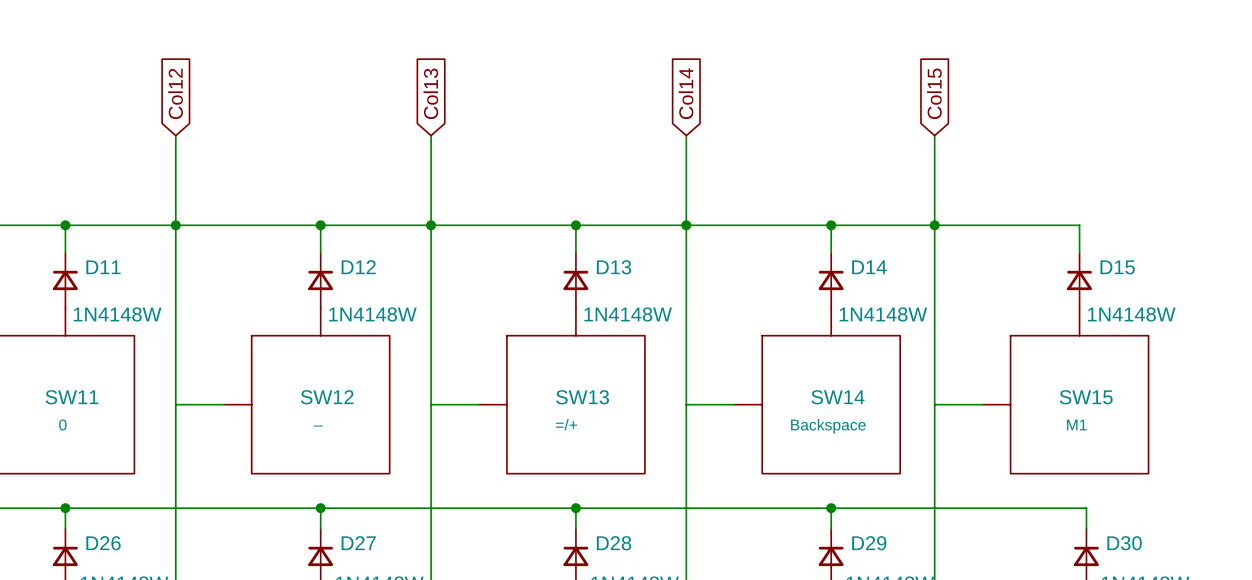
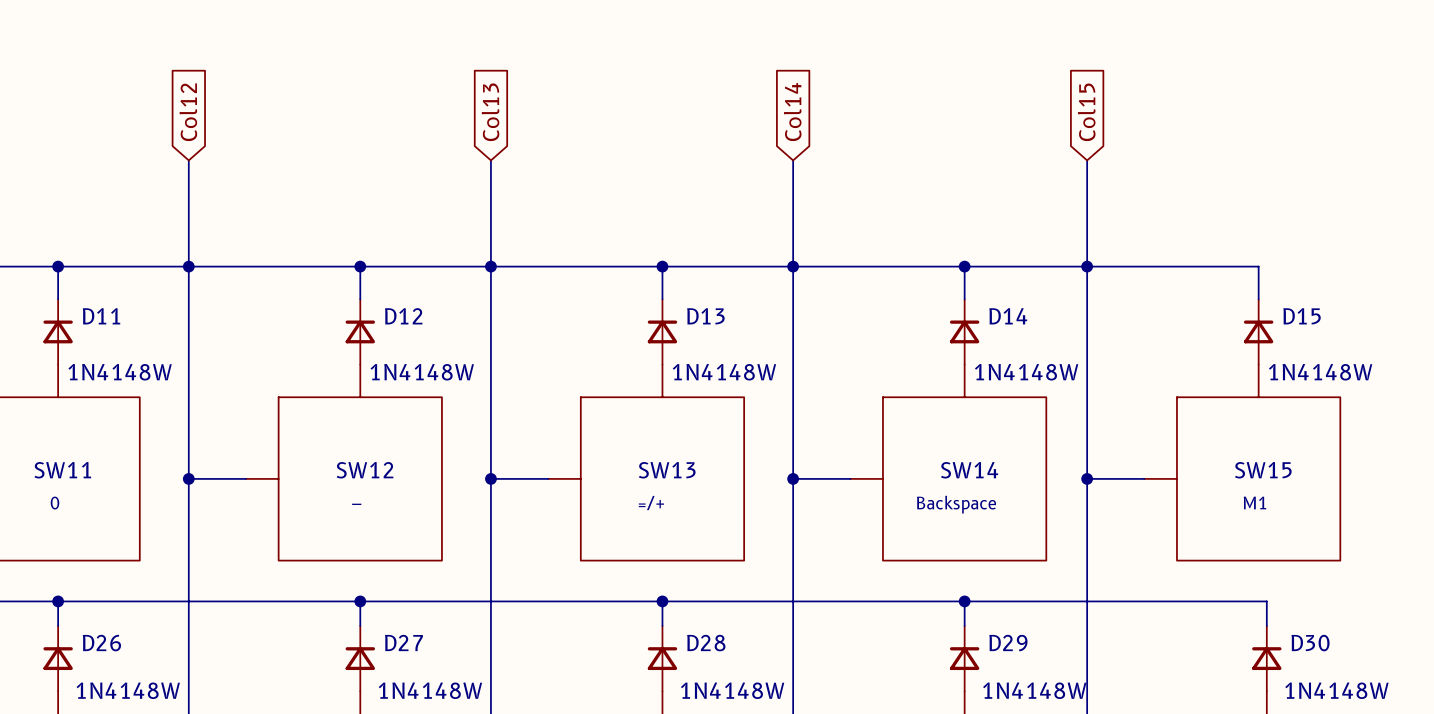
junction: none -> (188, 478)
junction: none -> (490, 478)
junction: none -> (793, 478)
junction: none -> (1087, 478)

